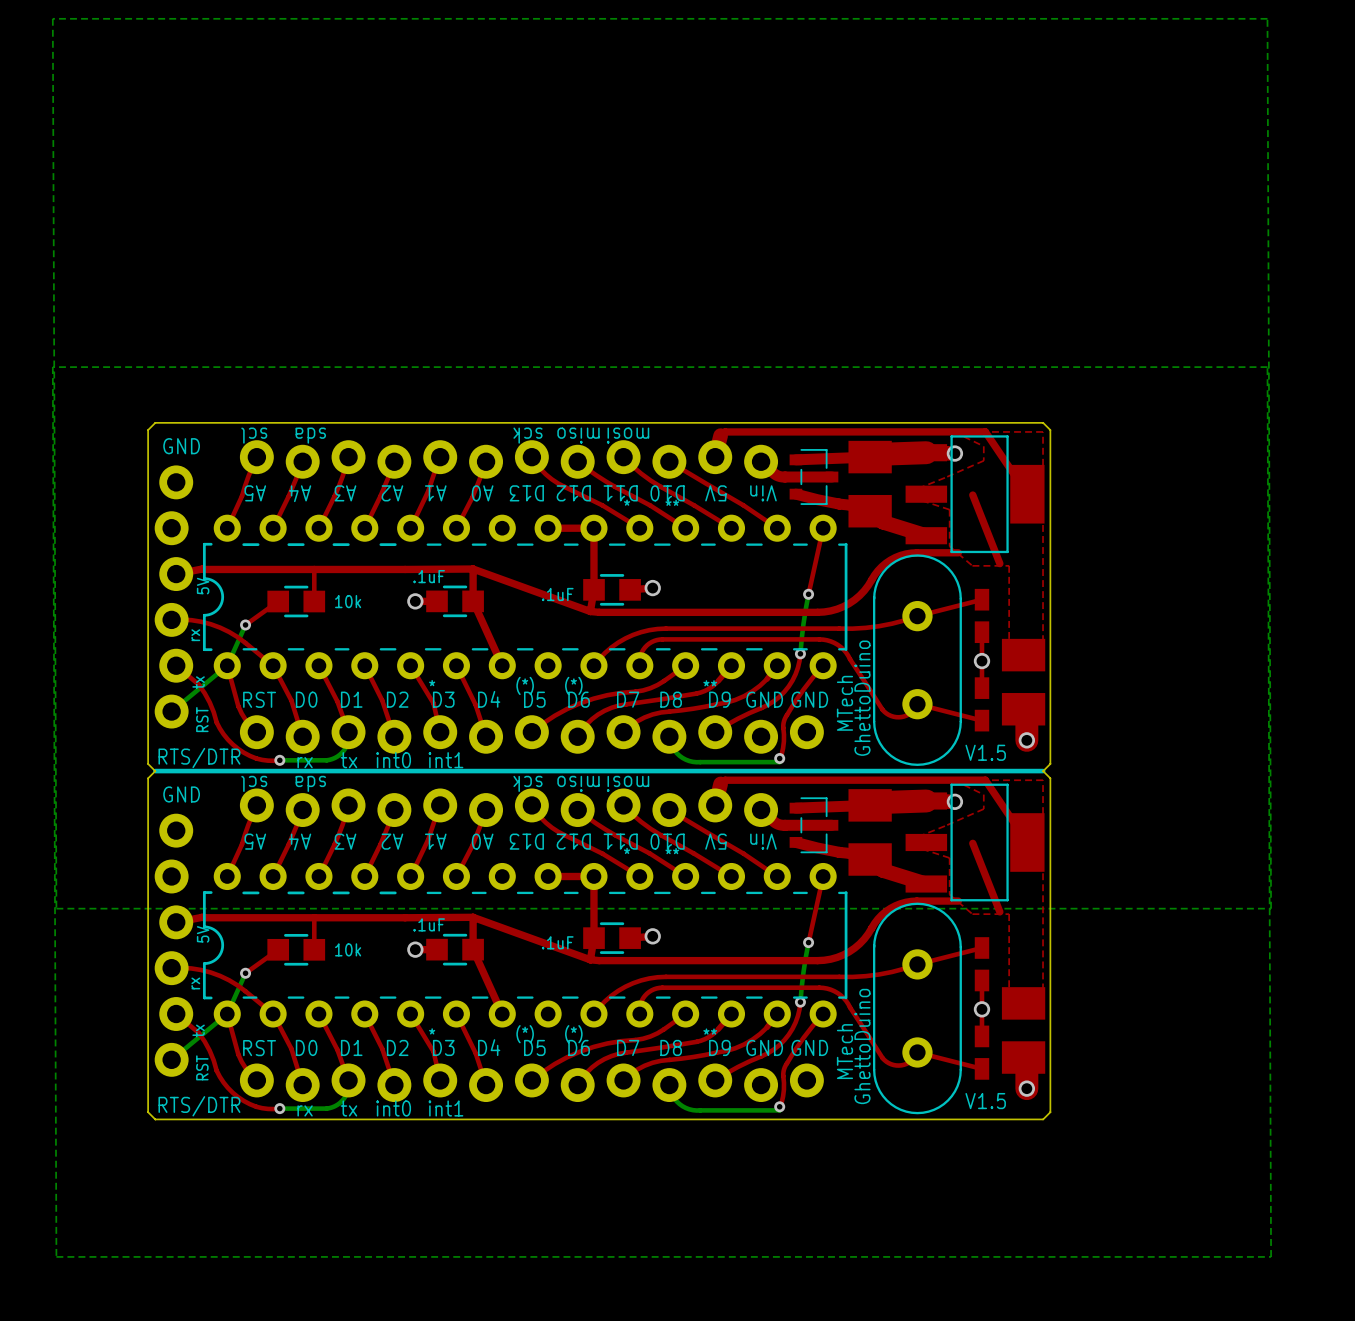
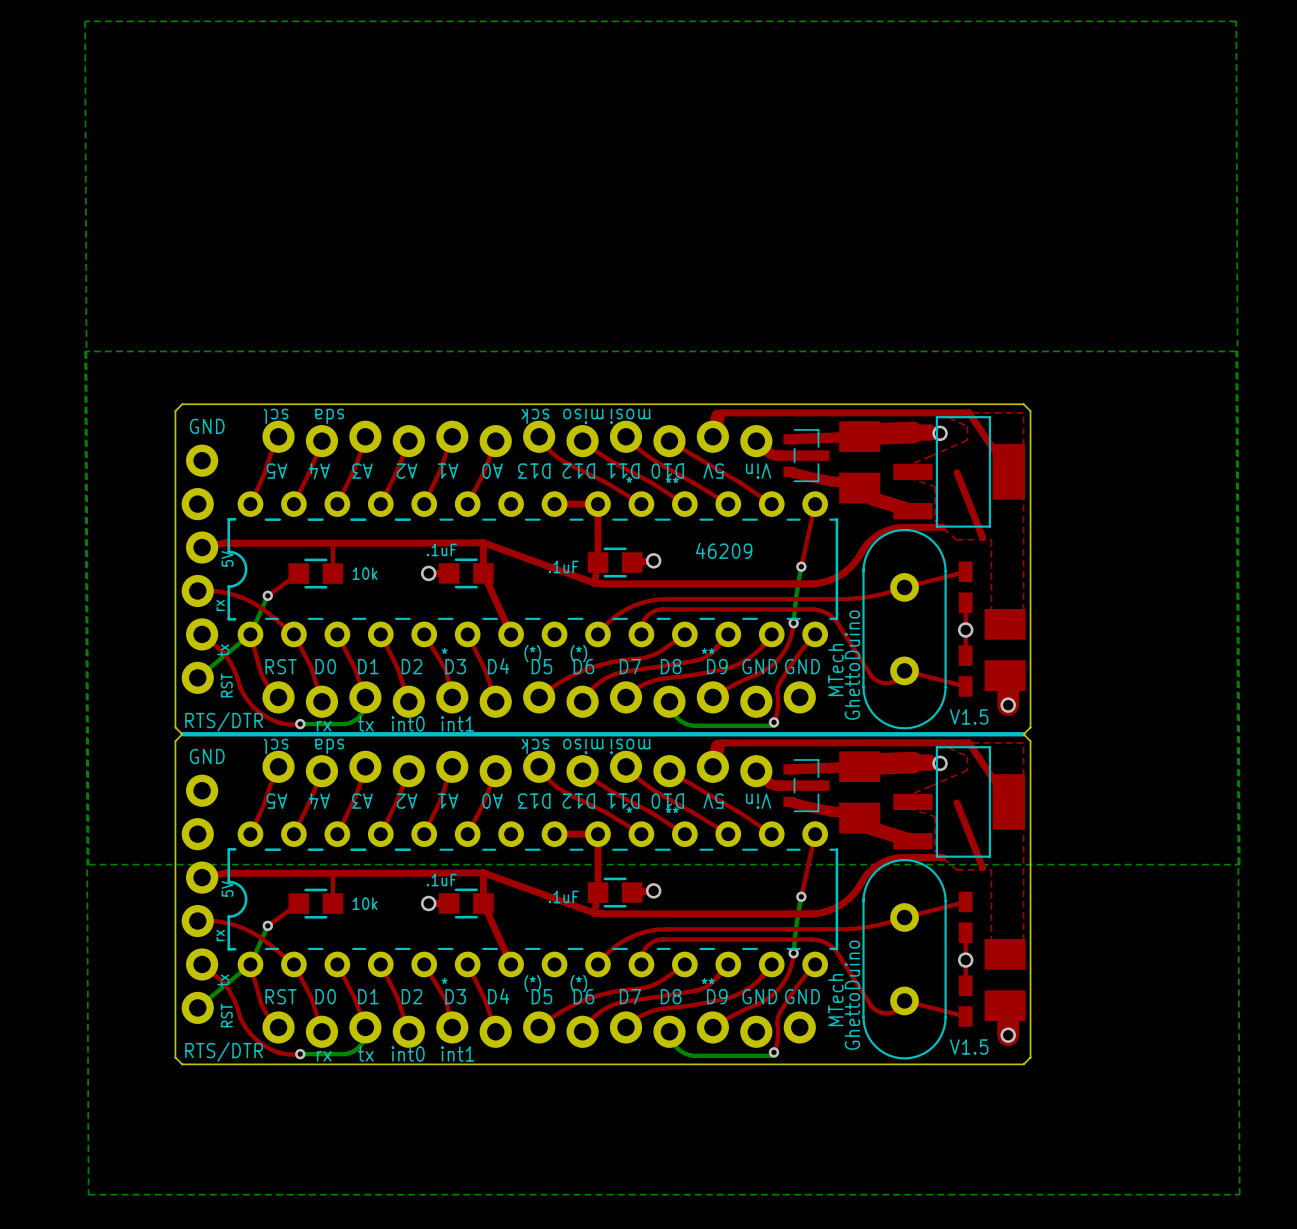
text: none -> 46209 (724, 550)

